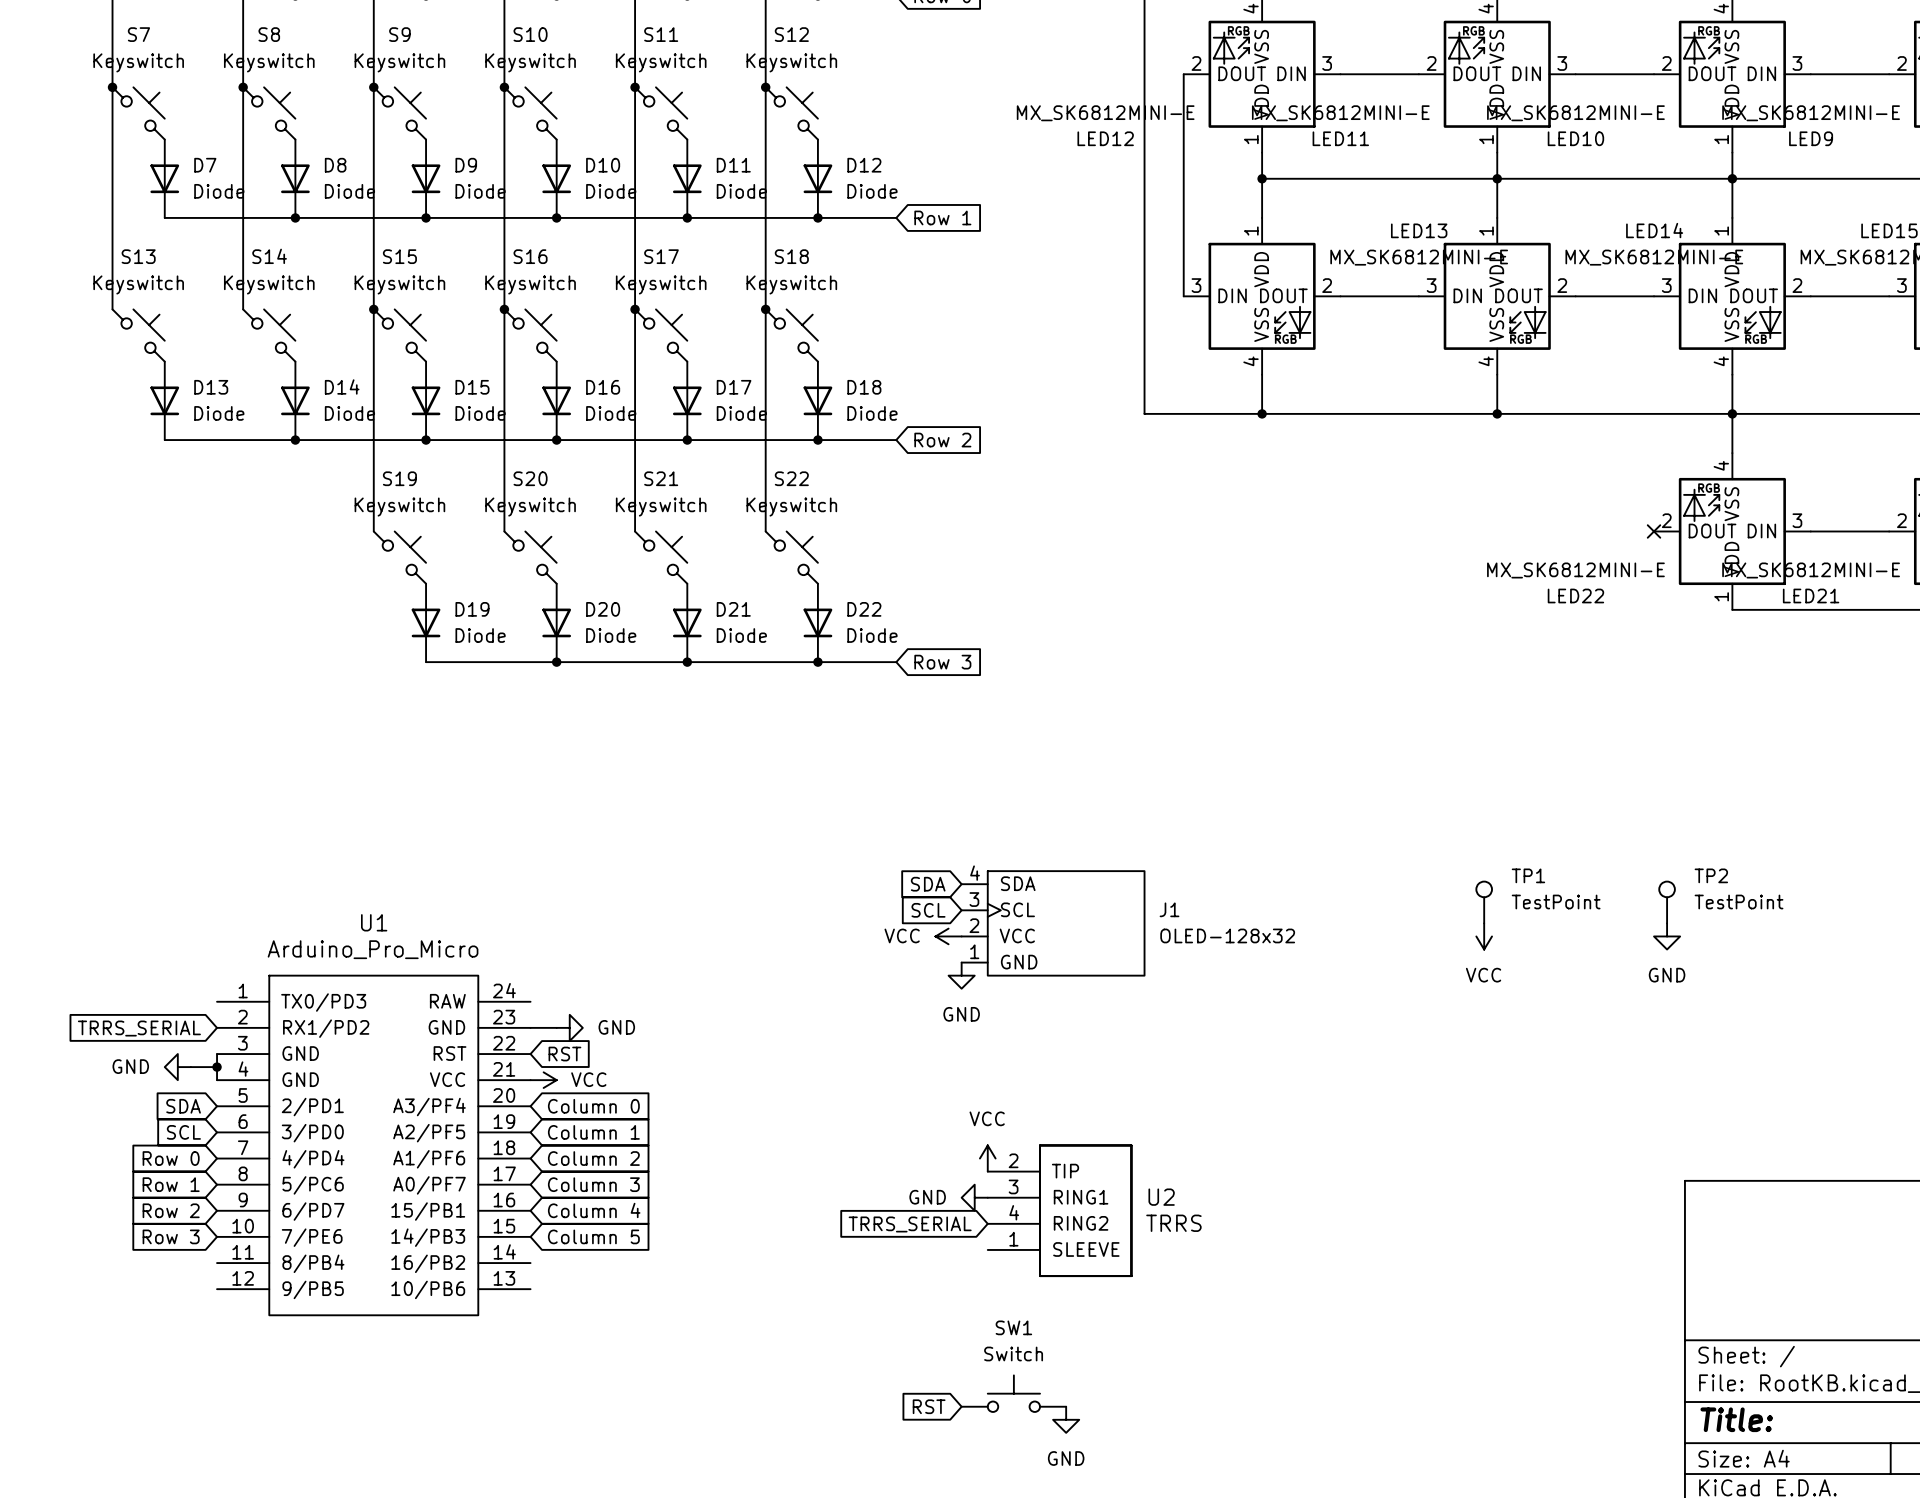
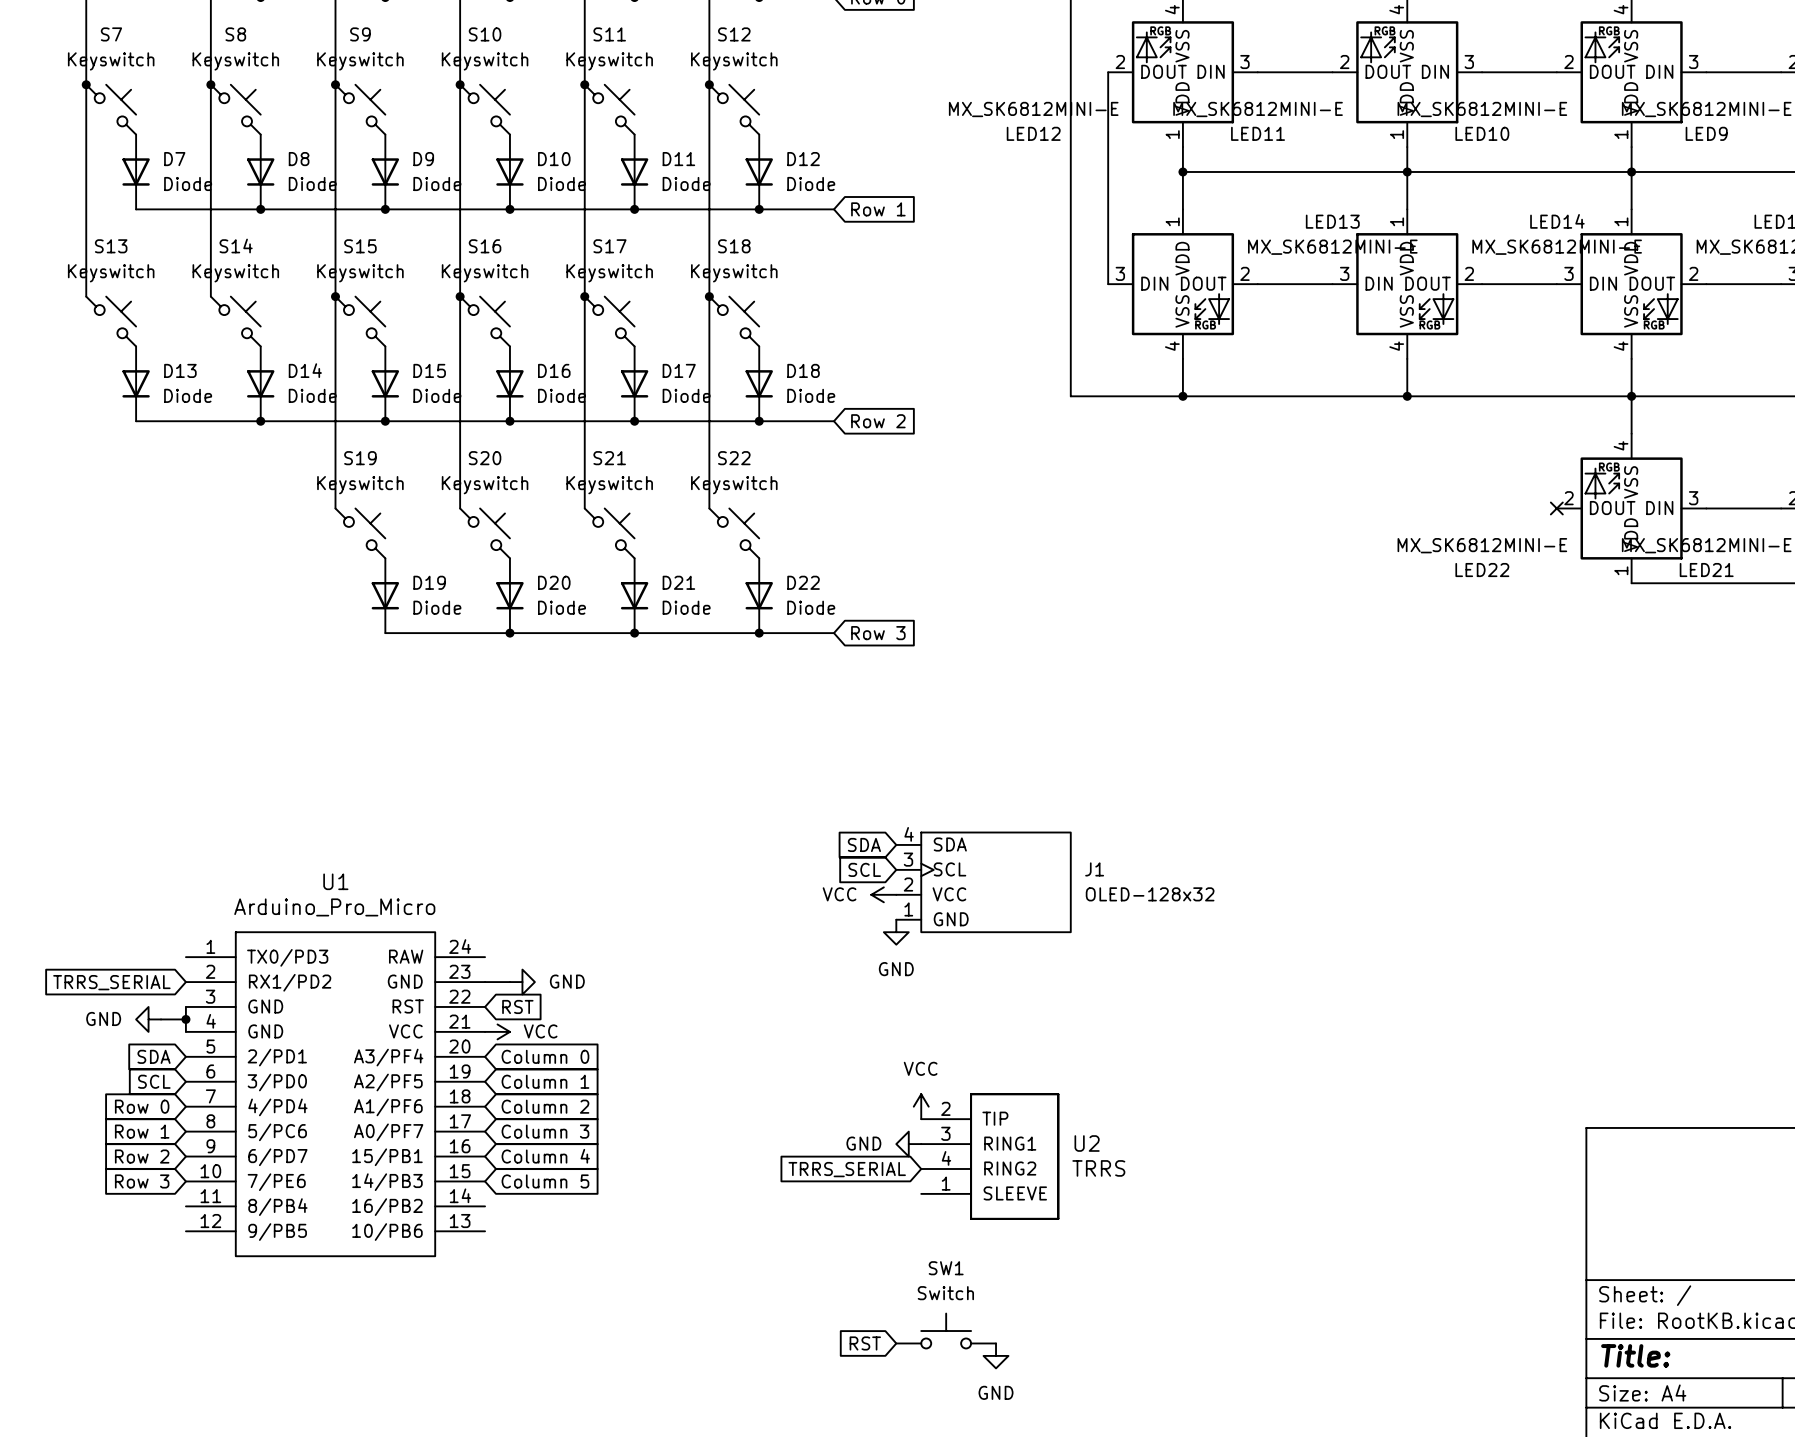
TP1: TestPoint (1484, 902) -> none
TP2: TestPoint (1667, 902) -> none
power symbol: VCC (1484, 936) -> none
power symbol: GND (1667, 936) -> none

